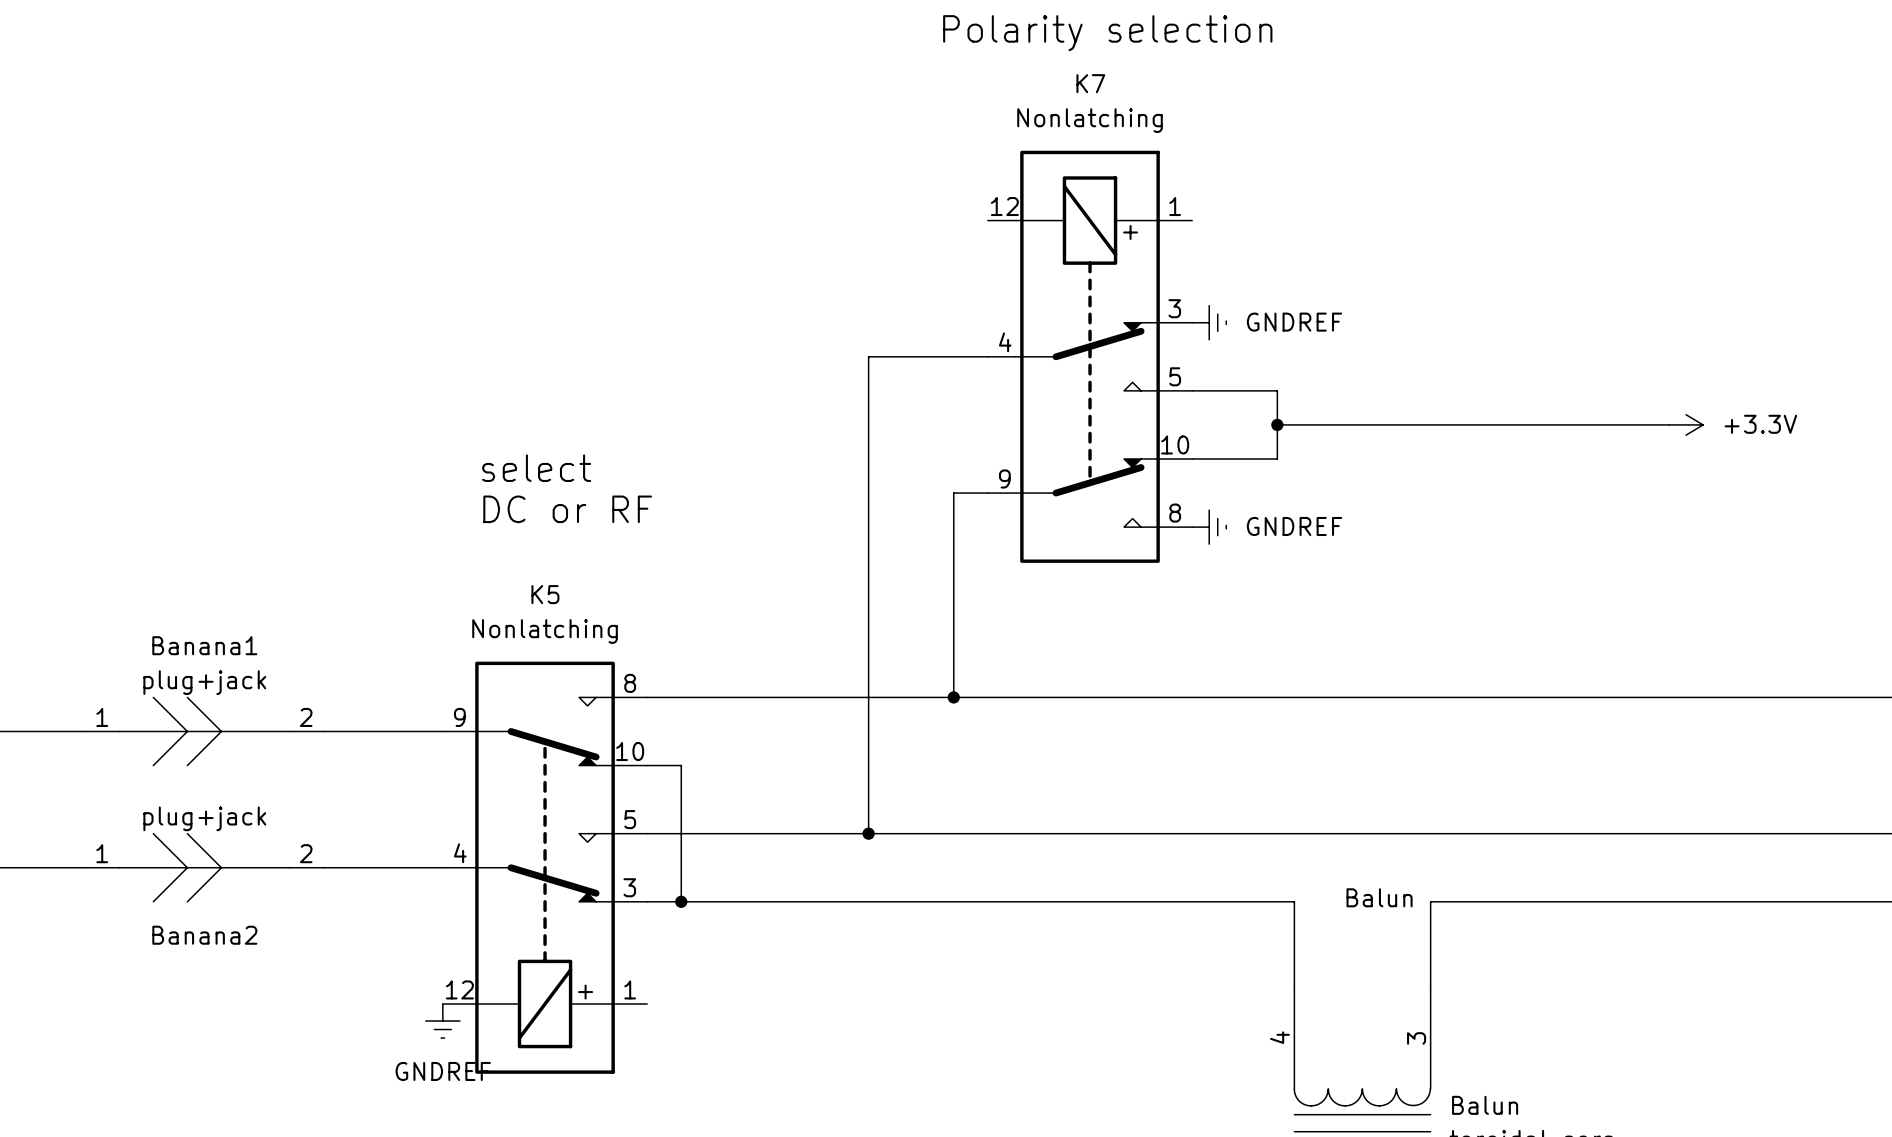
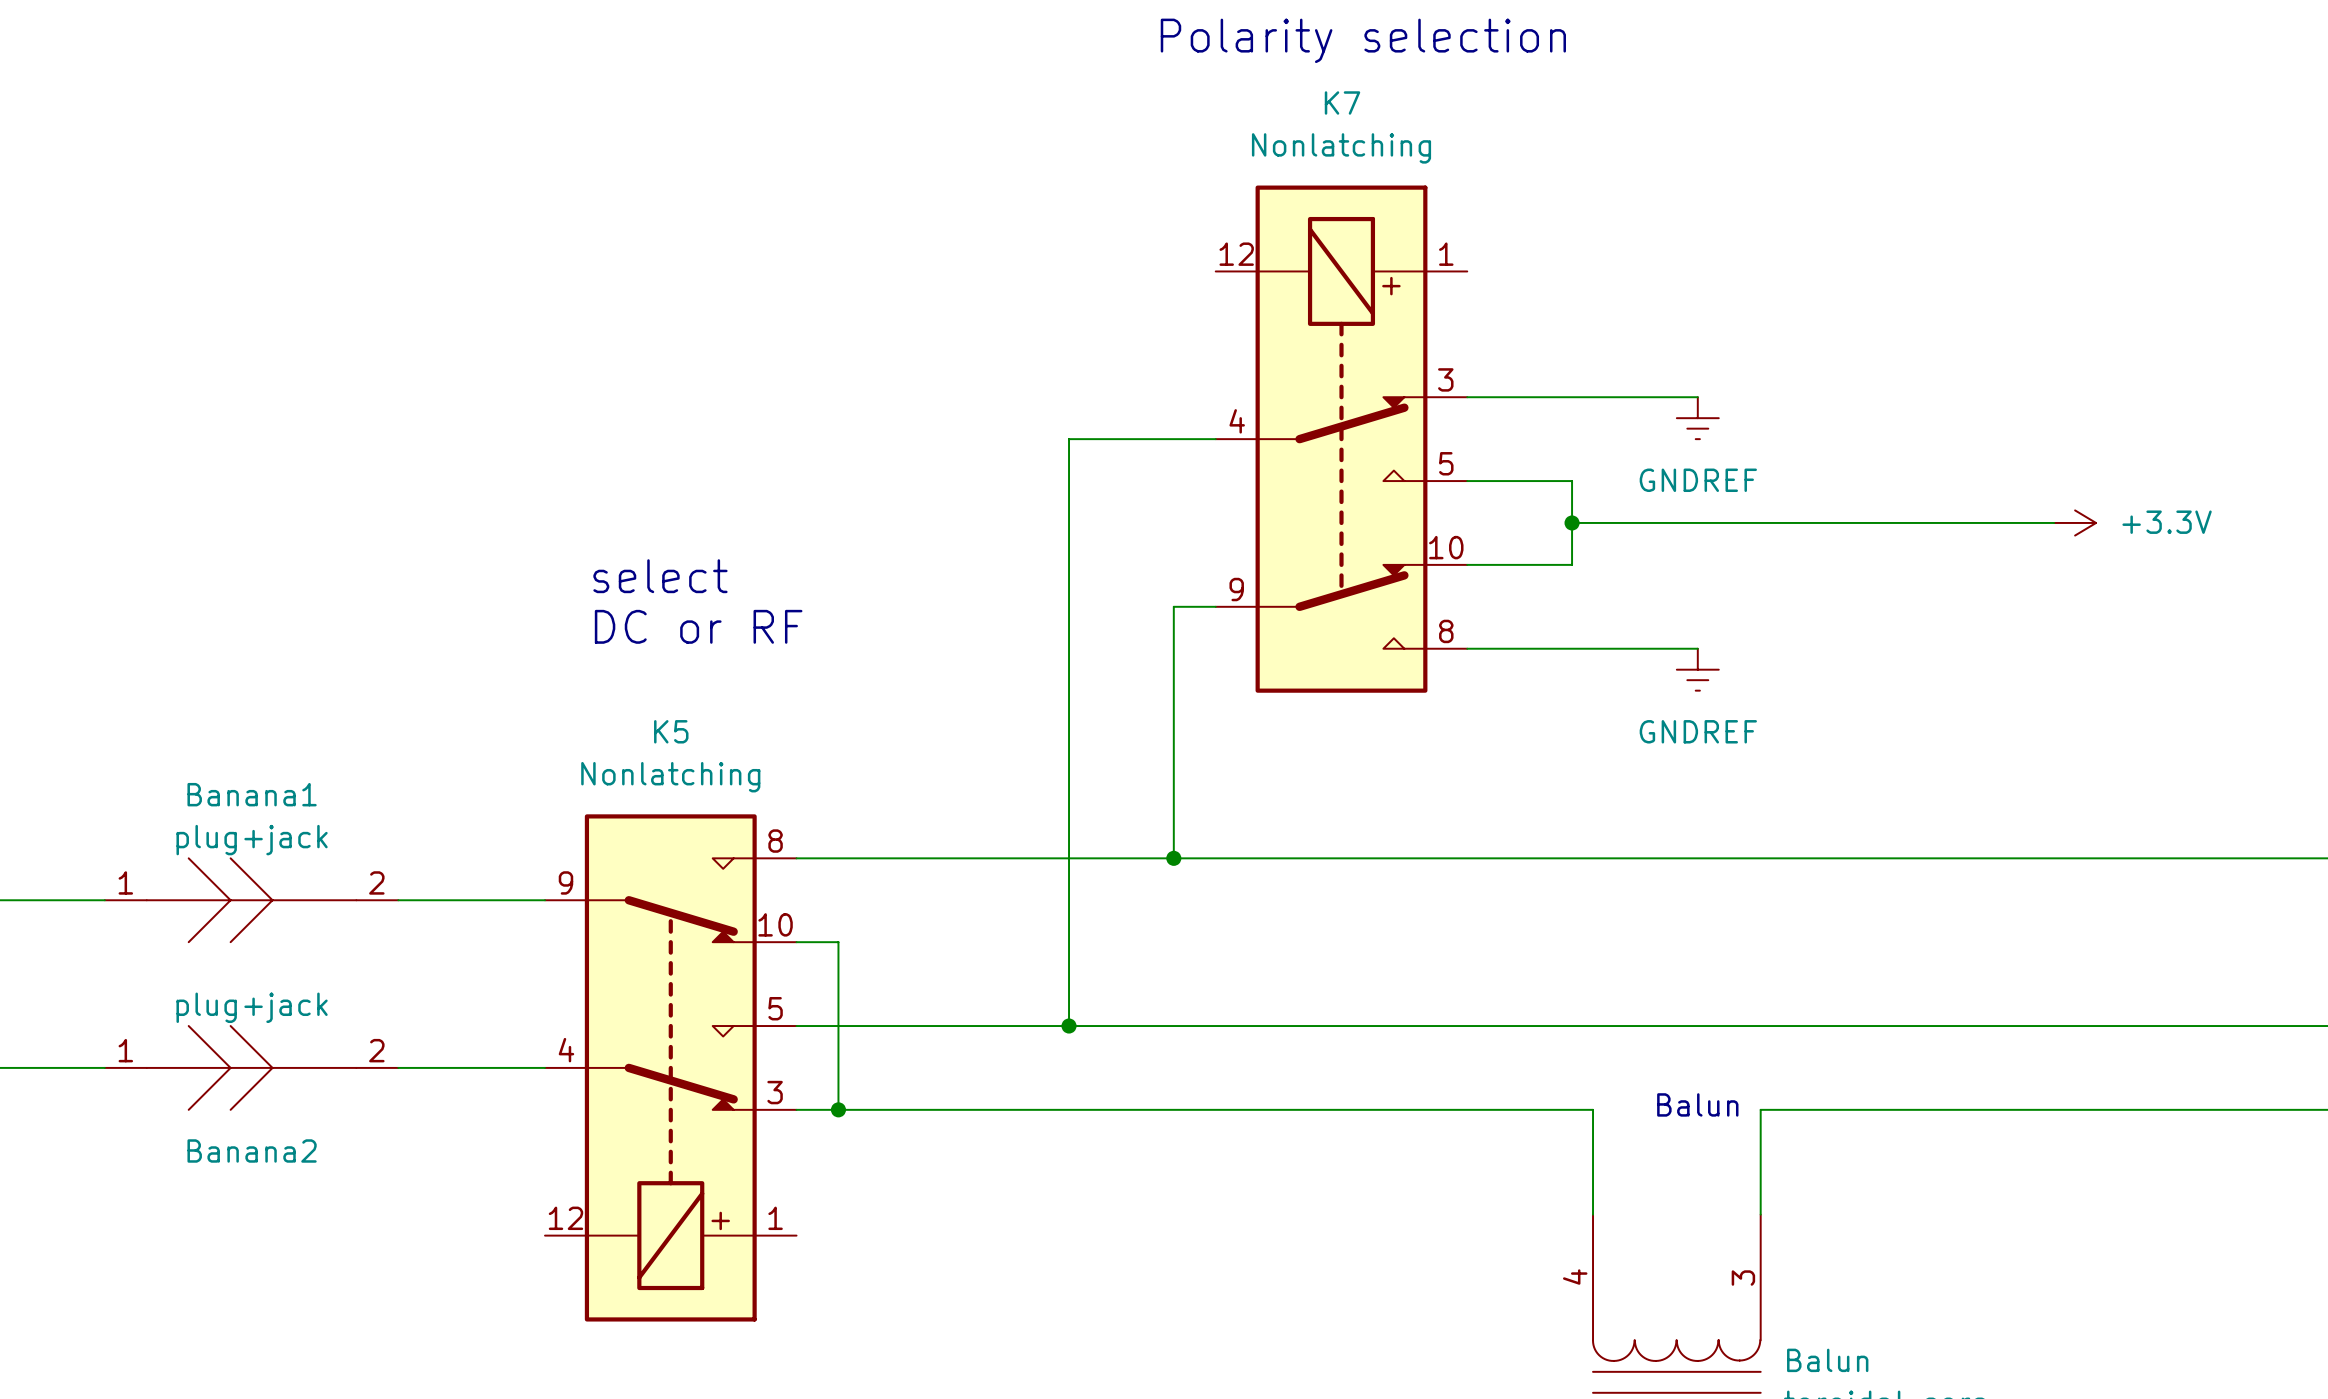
wire: none -> (1467, 397) (1697, 397)
power symbol: GNDREF (1209, 322) -> none
power symbol: none -> GNDREF (1697, 418)
wire: none -> (1467, 648) (1697, 648)
power symbol: GNDREF (1209, 527) -> none
power symbol: none -> GNDREF (1697, 669)
power symbol: GNDREF (442, 1021) -> none

